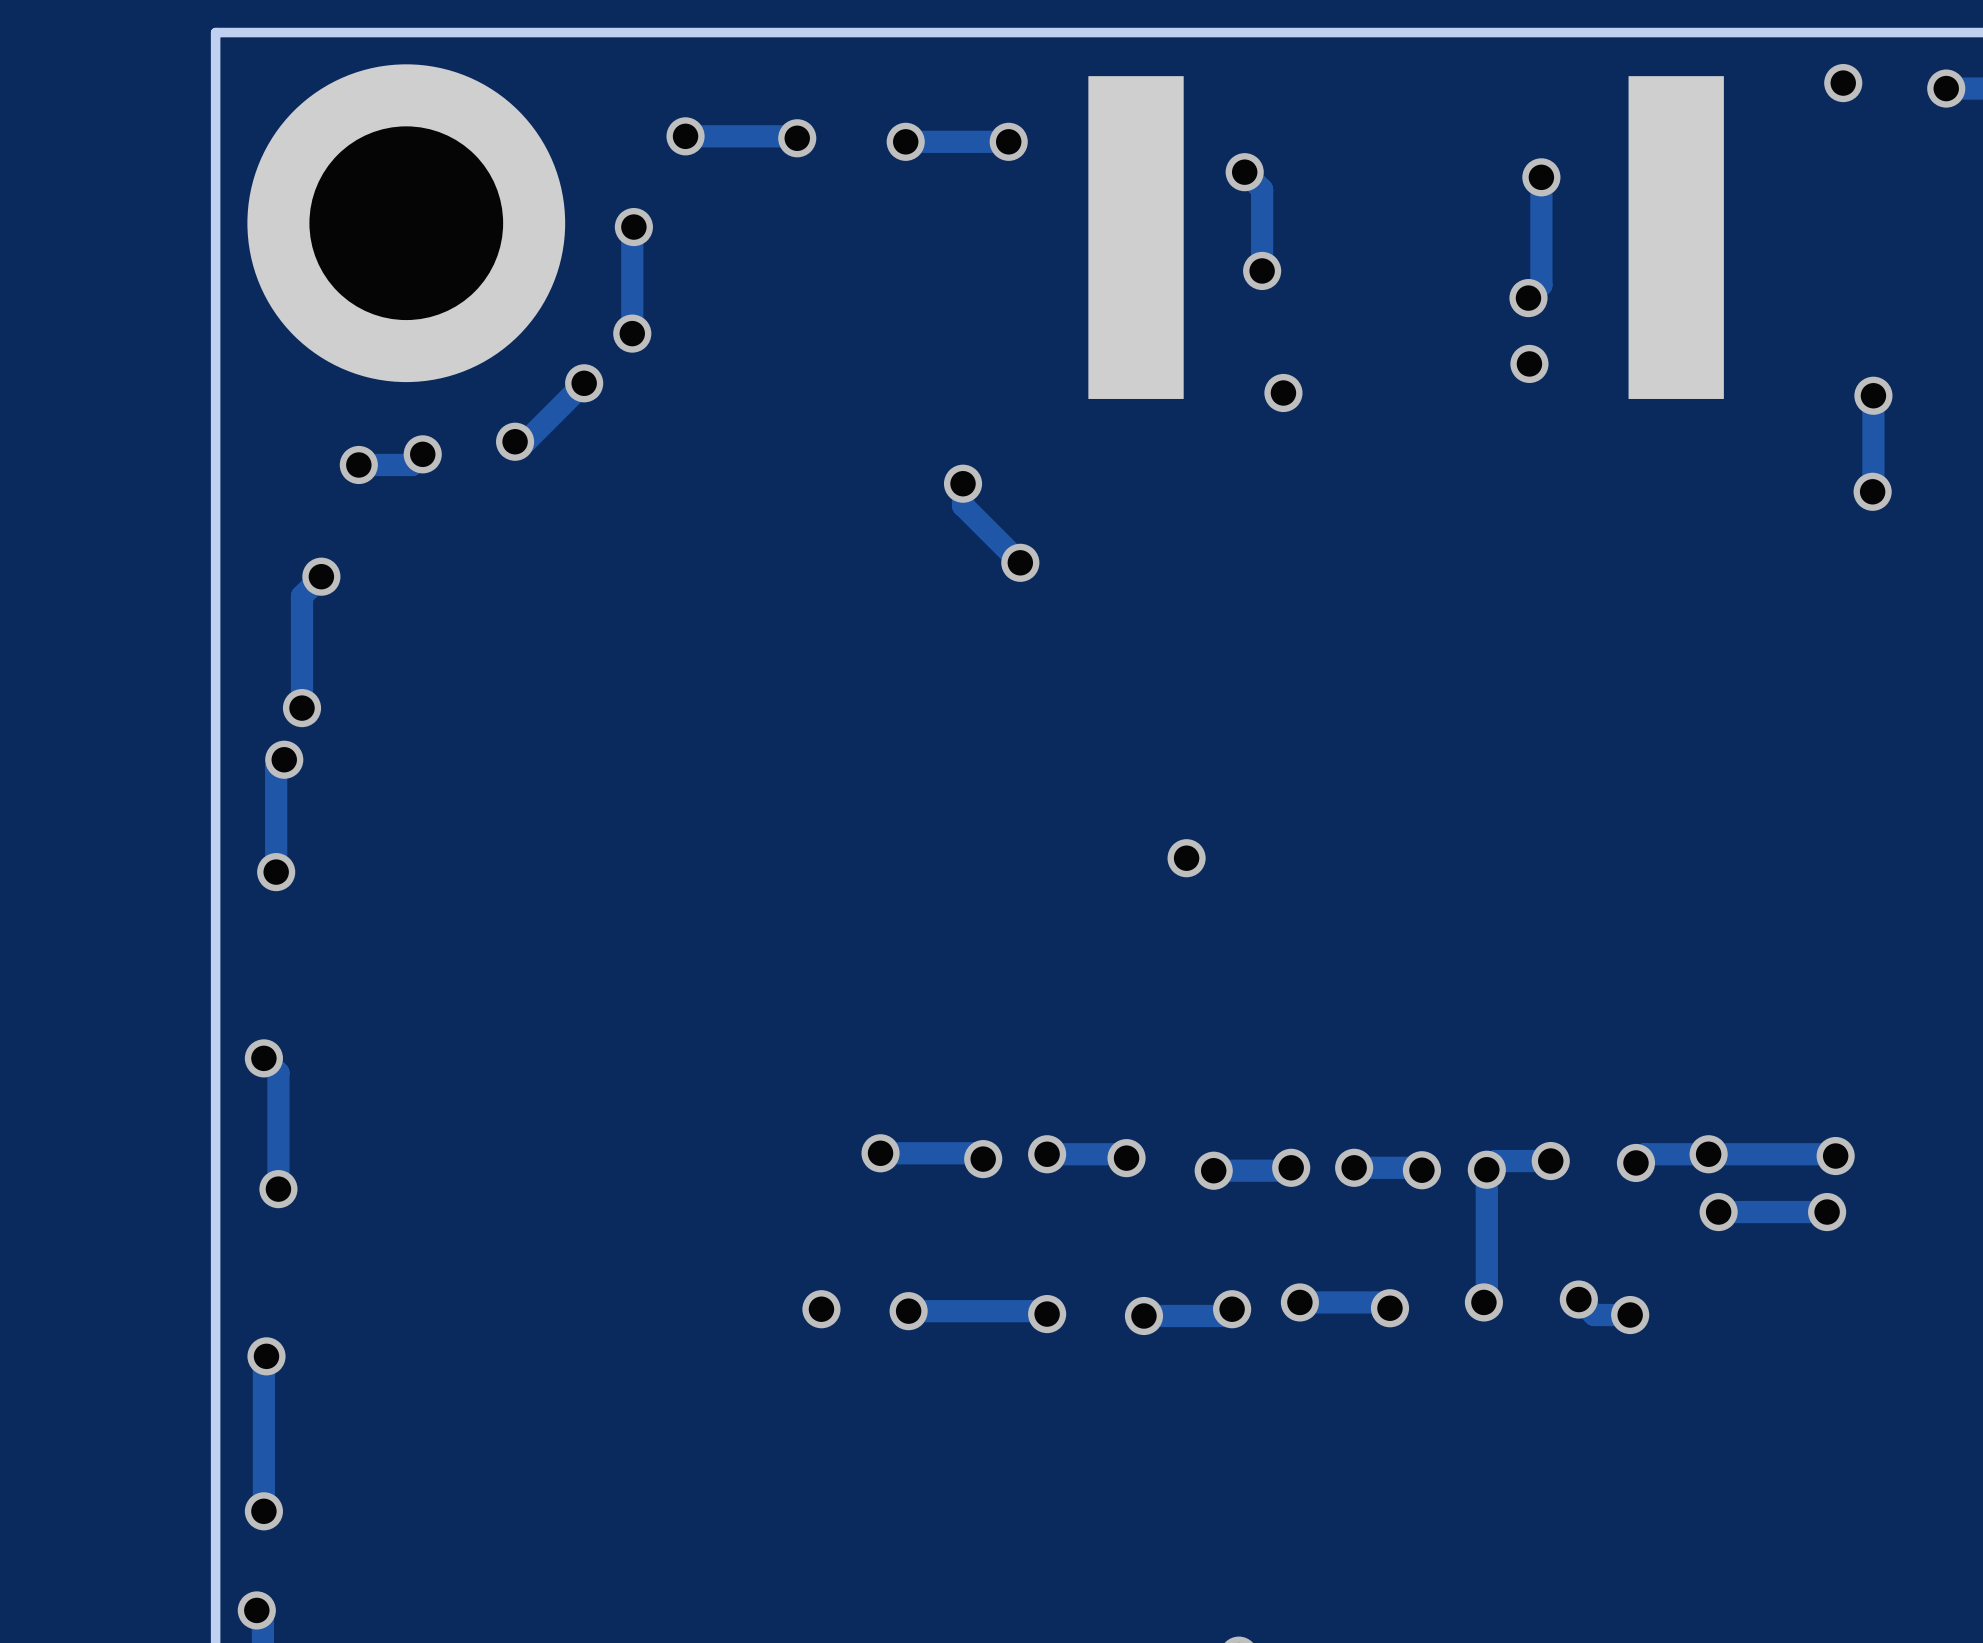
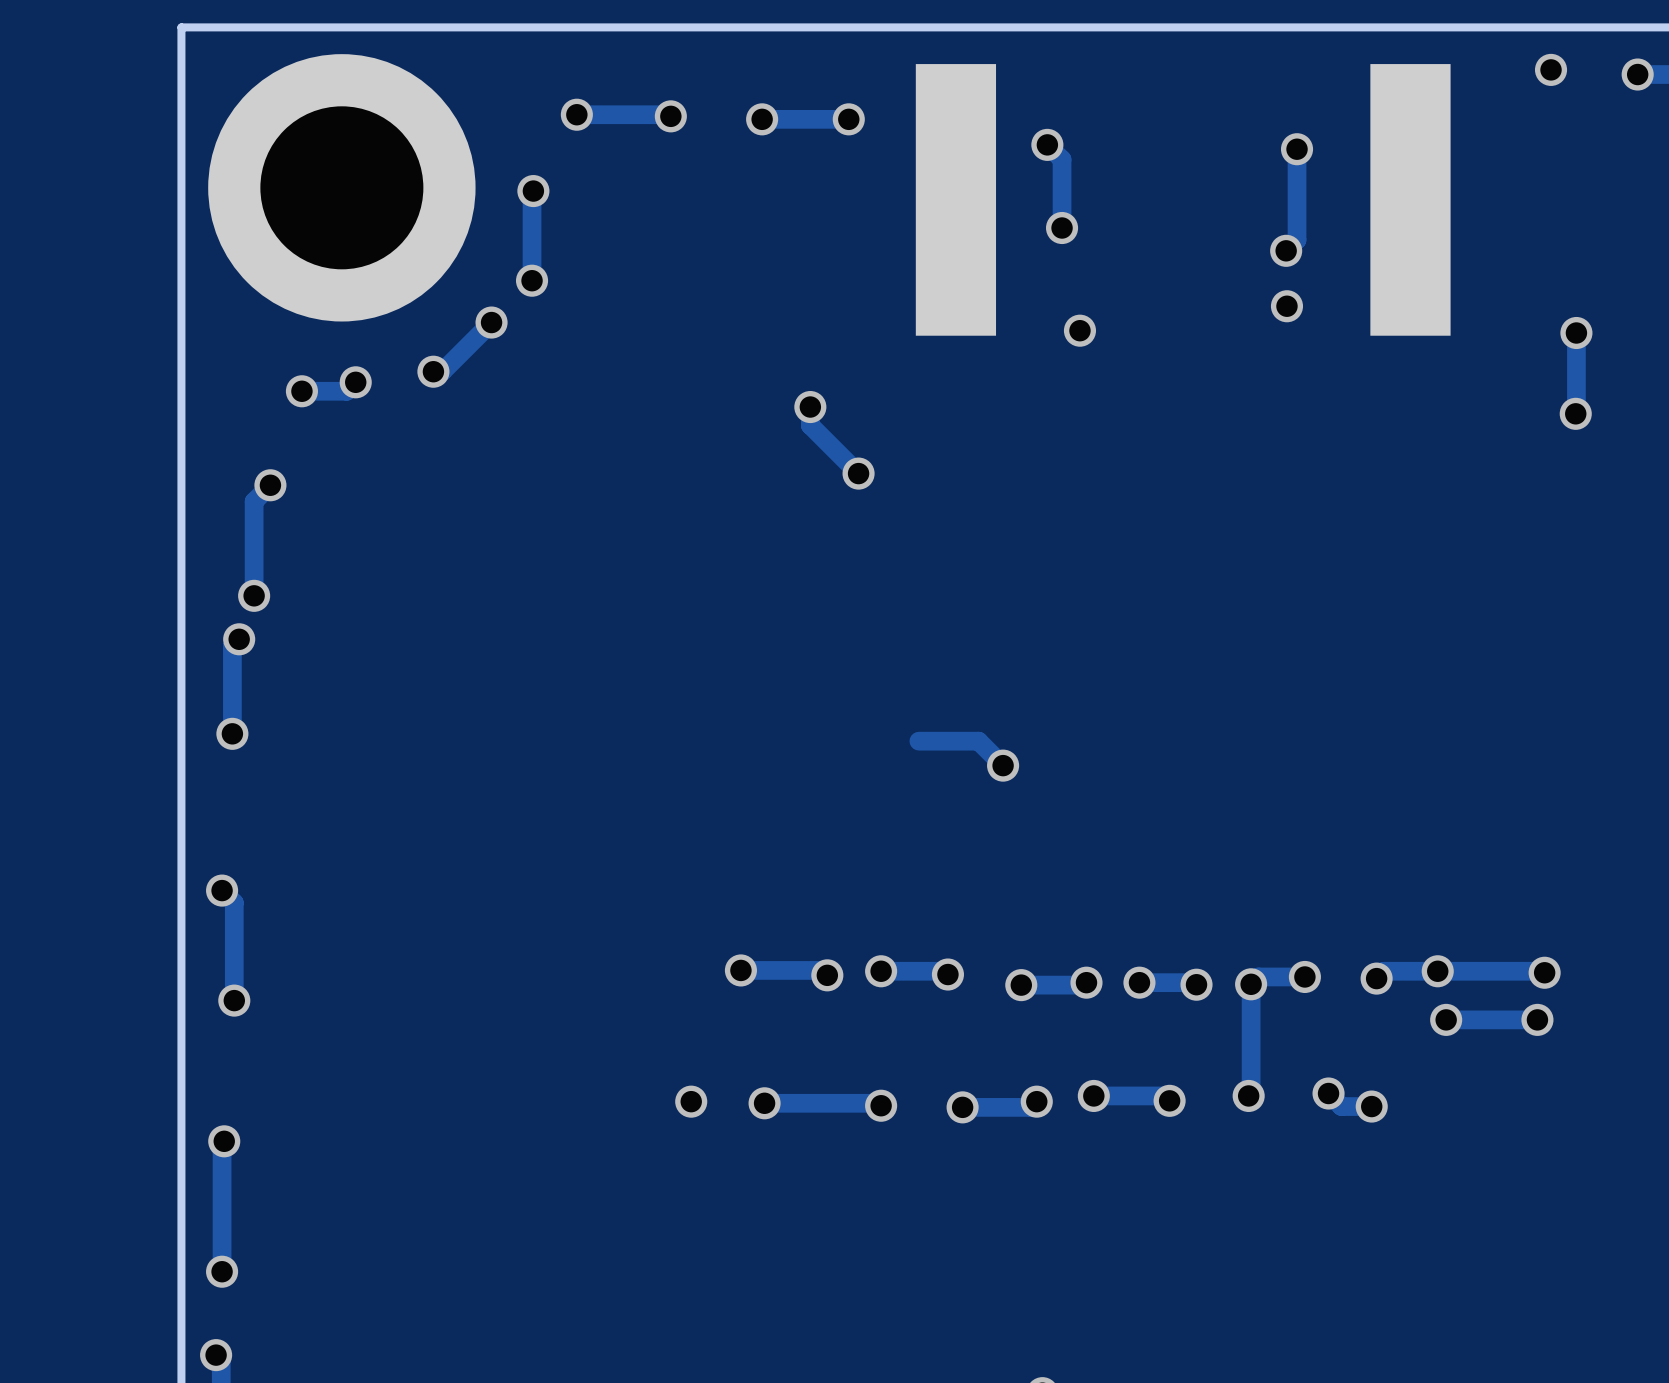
via position: (1186, 858) -> (1003, 765)
track: none -> (918, 741) (978, 741) (1003, 765)

